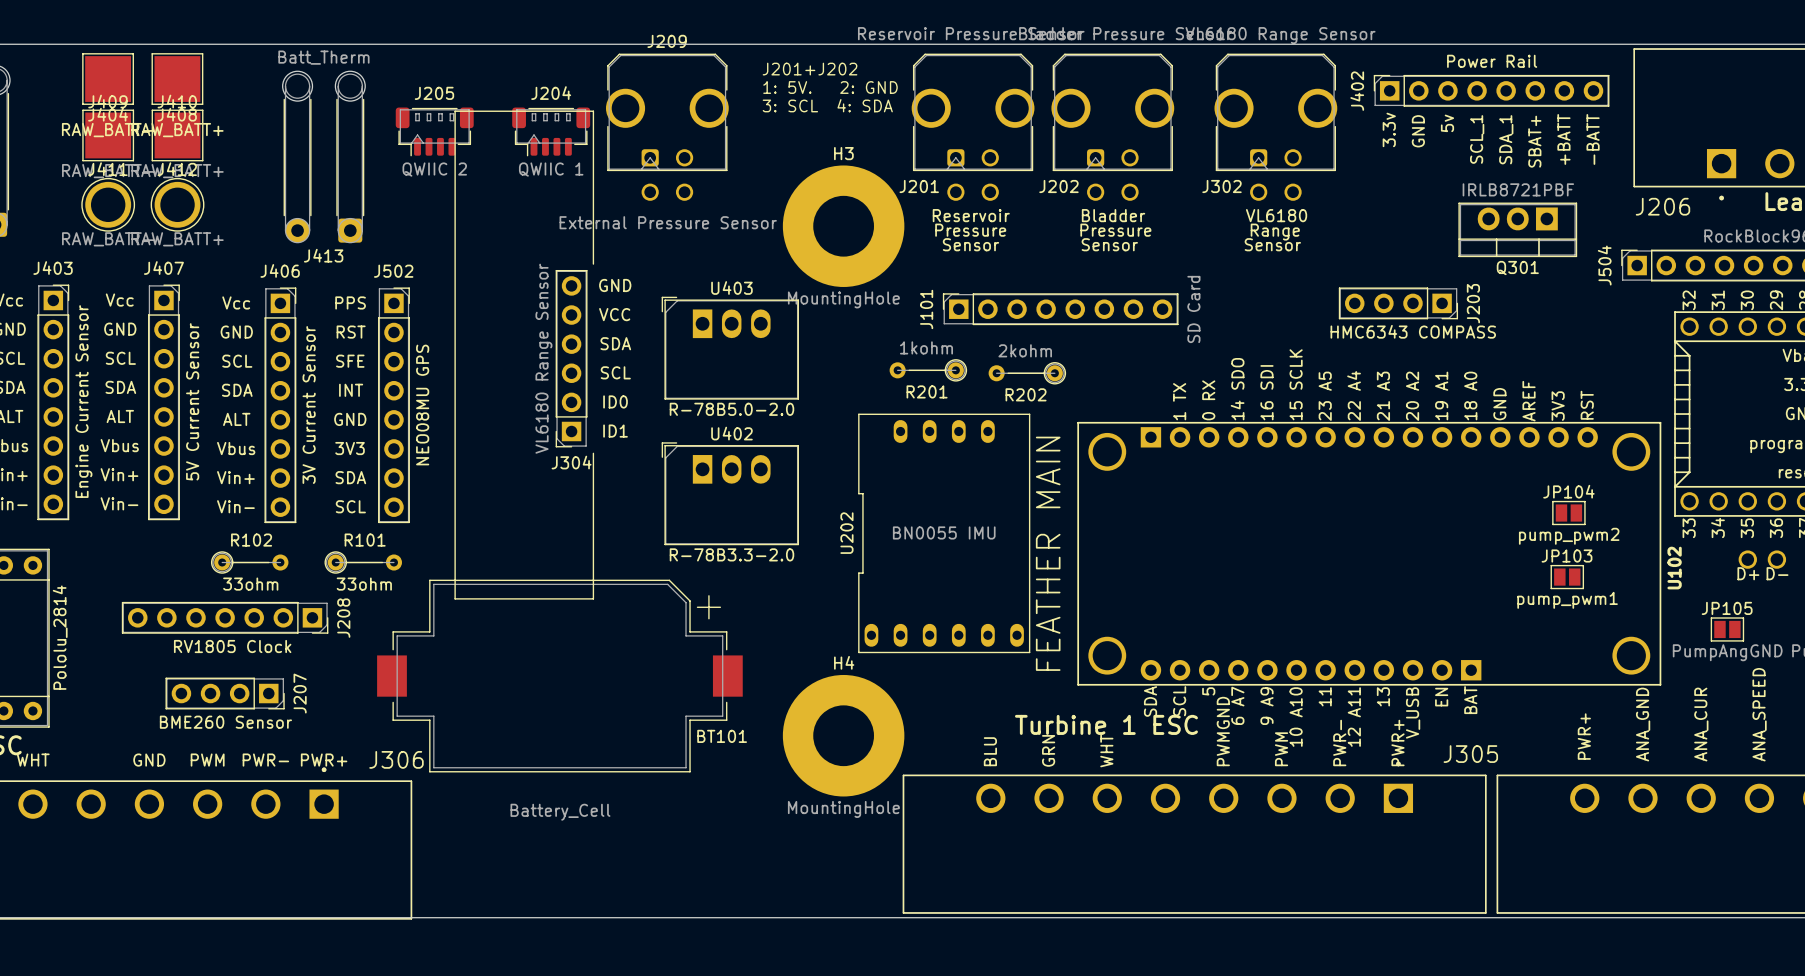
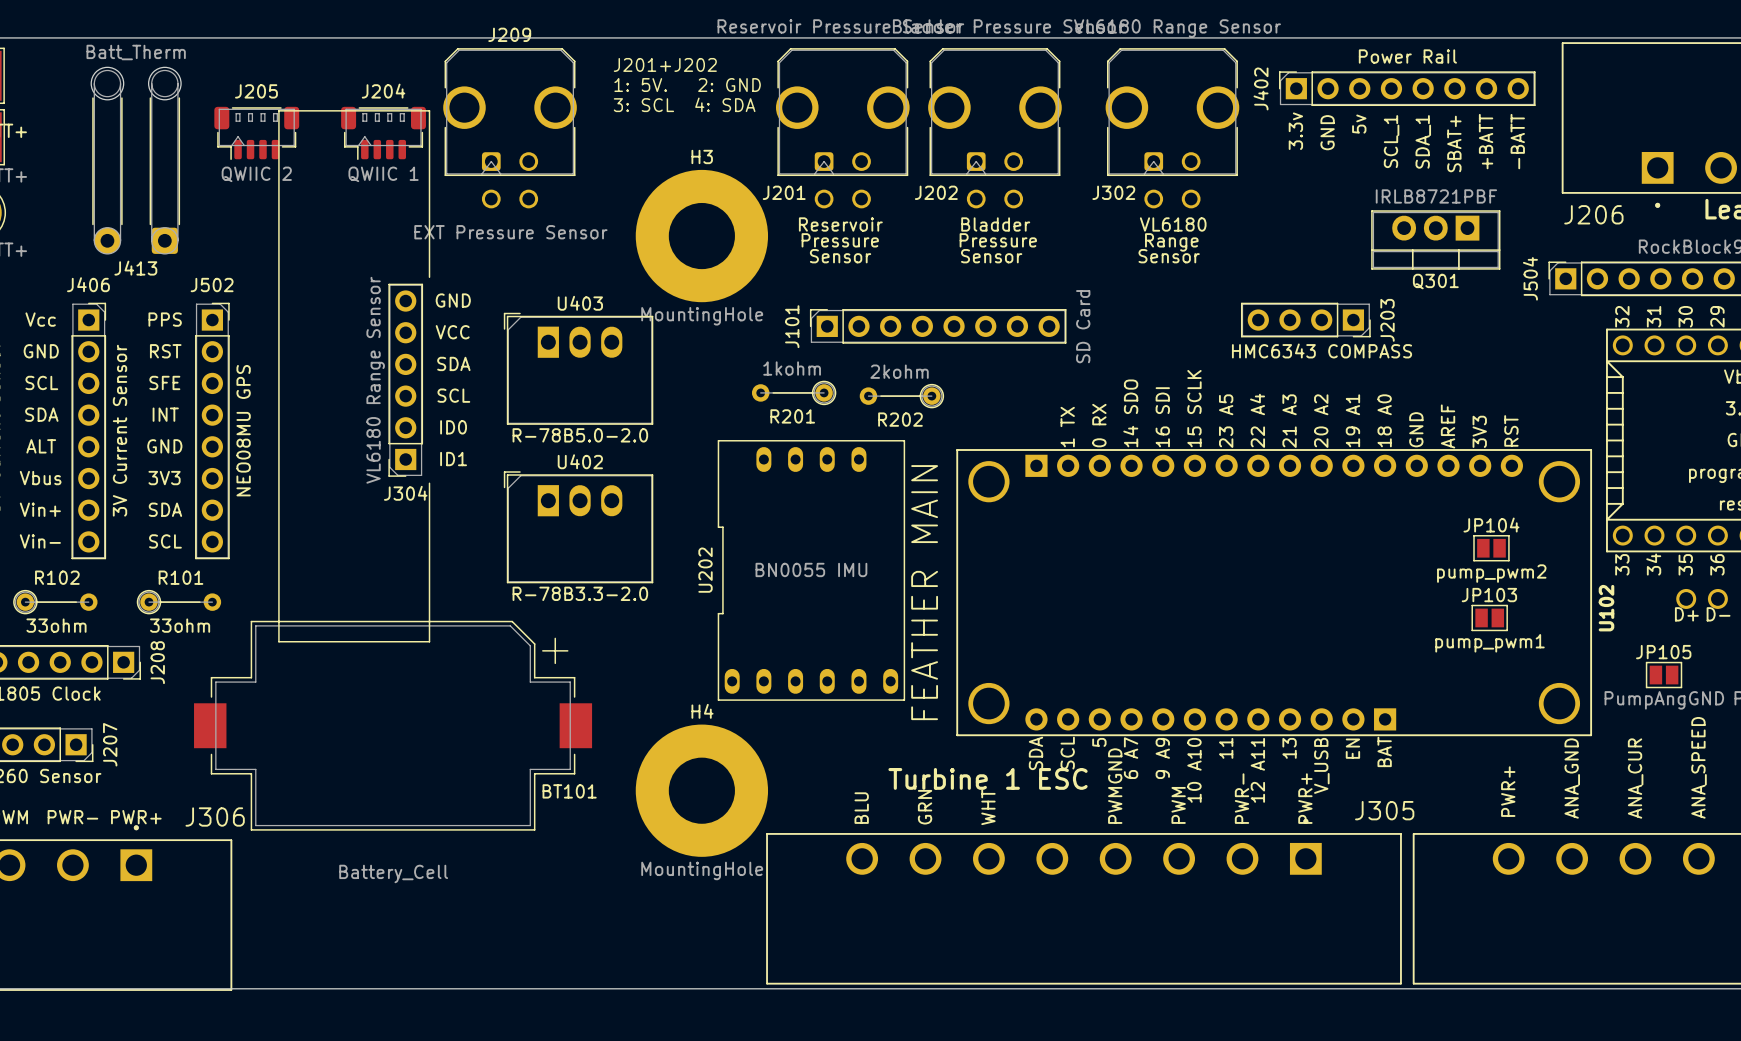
J209 value: External Pressure Sensor (668, 222) -> EXT Pressure Sensor (510, 232)

